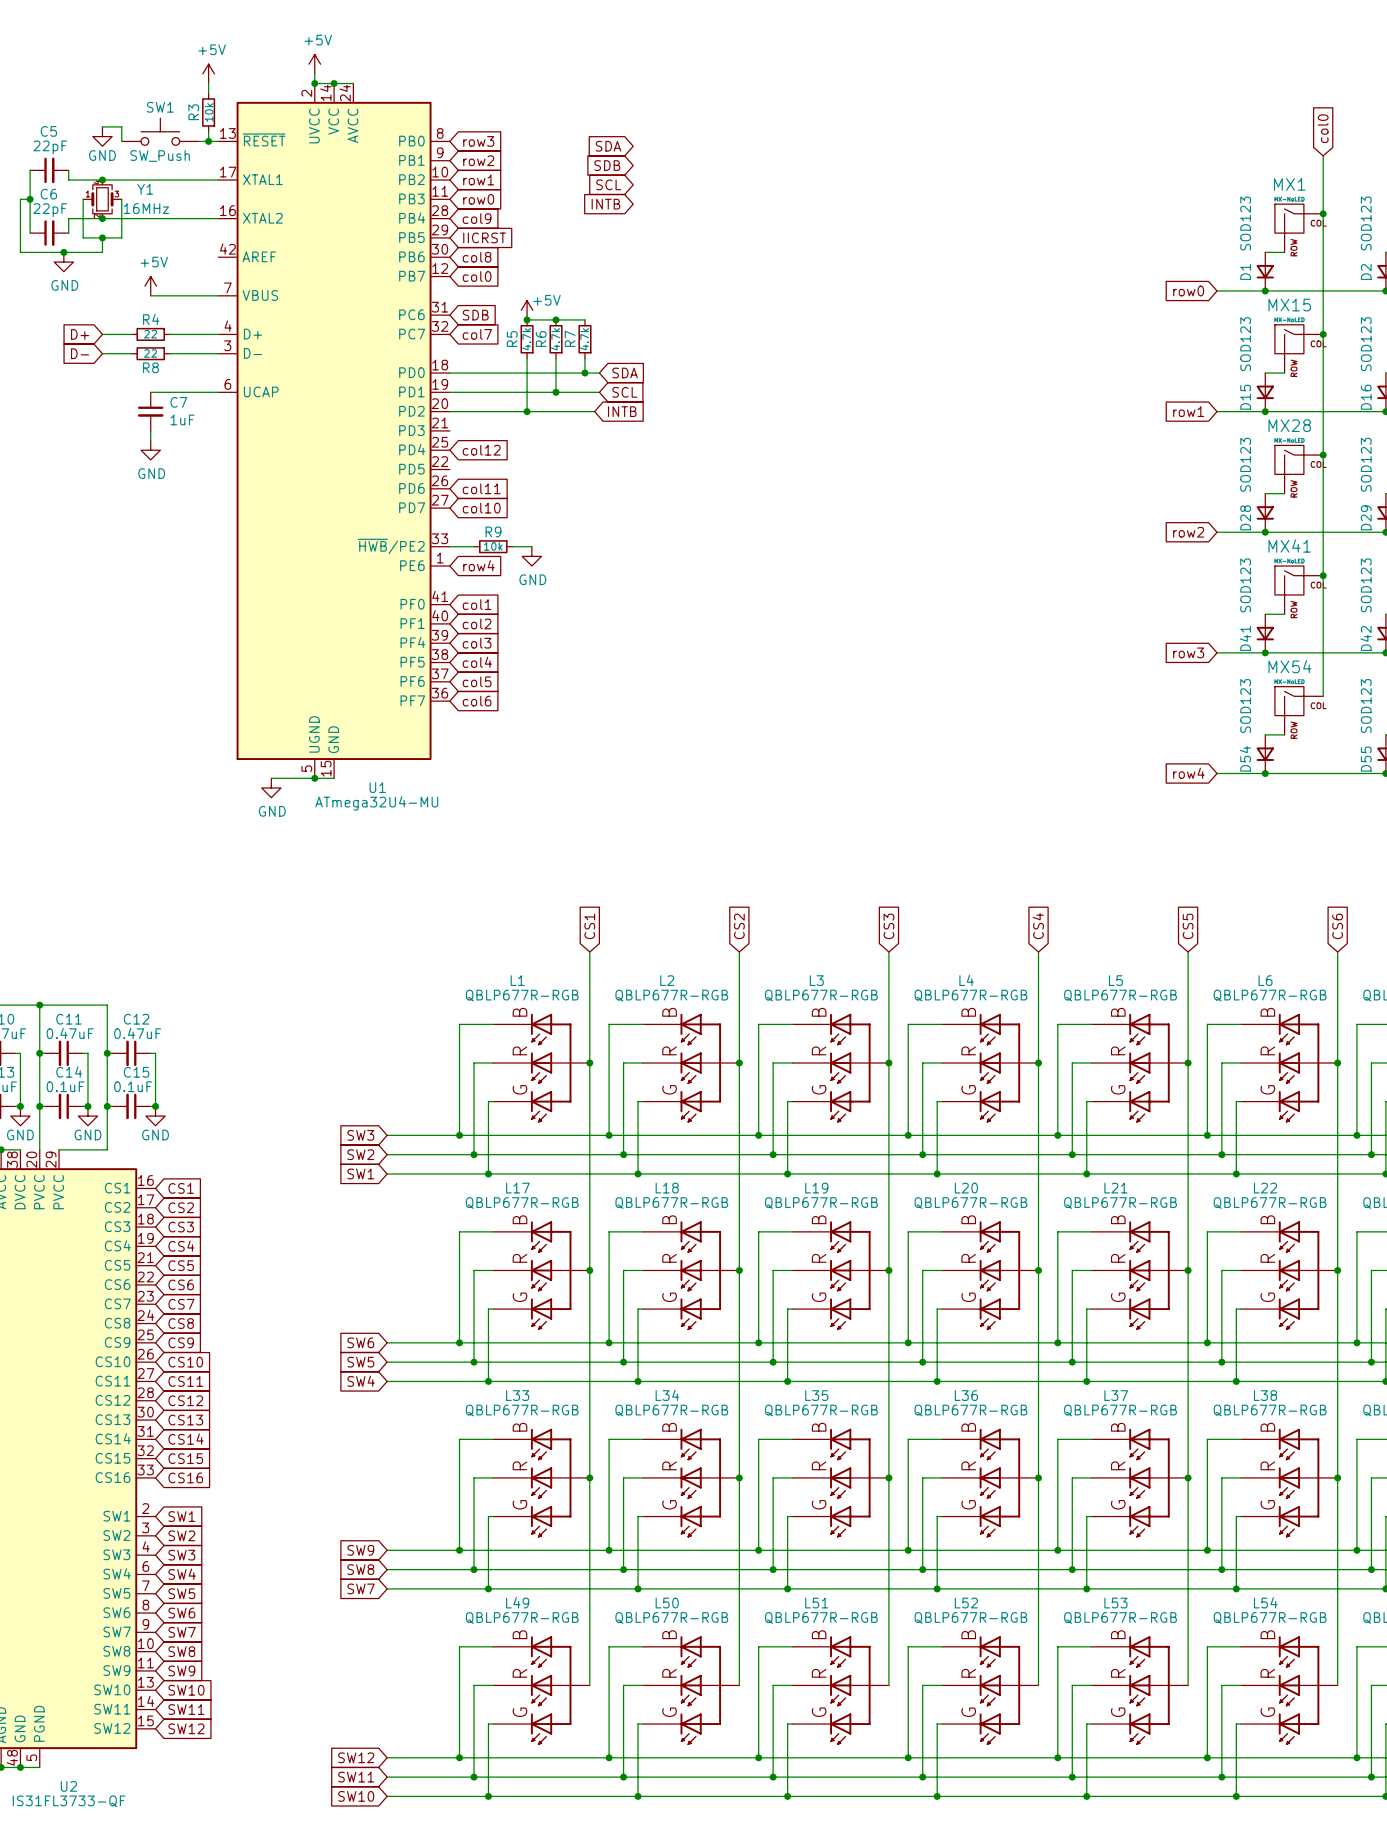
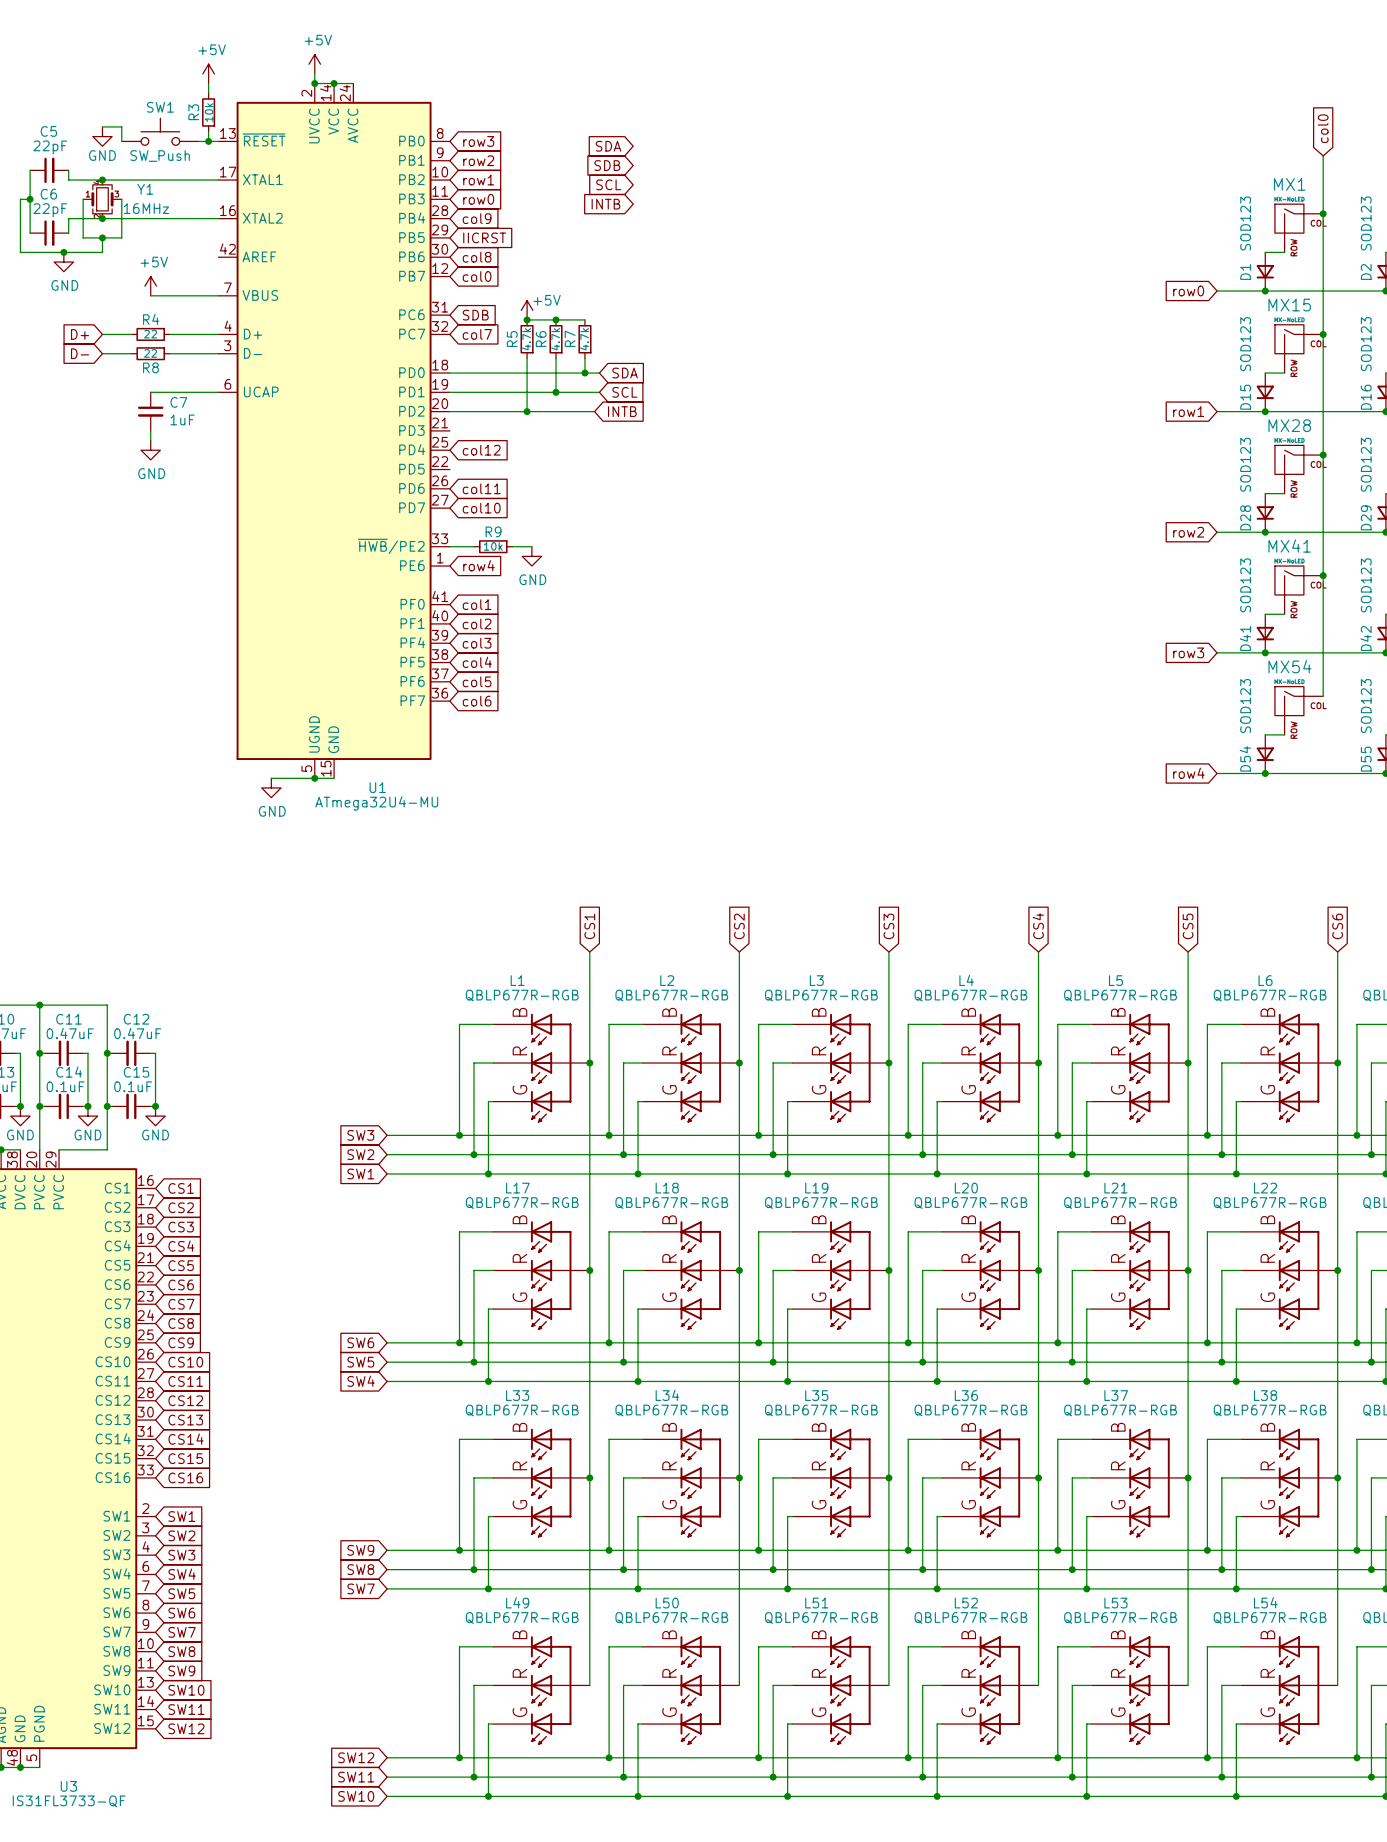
U2 name: U2 (68, 1786) -> U3 (68, 1786)

